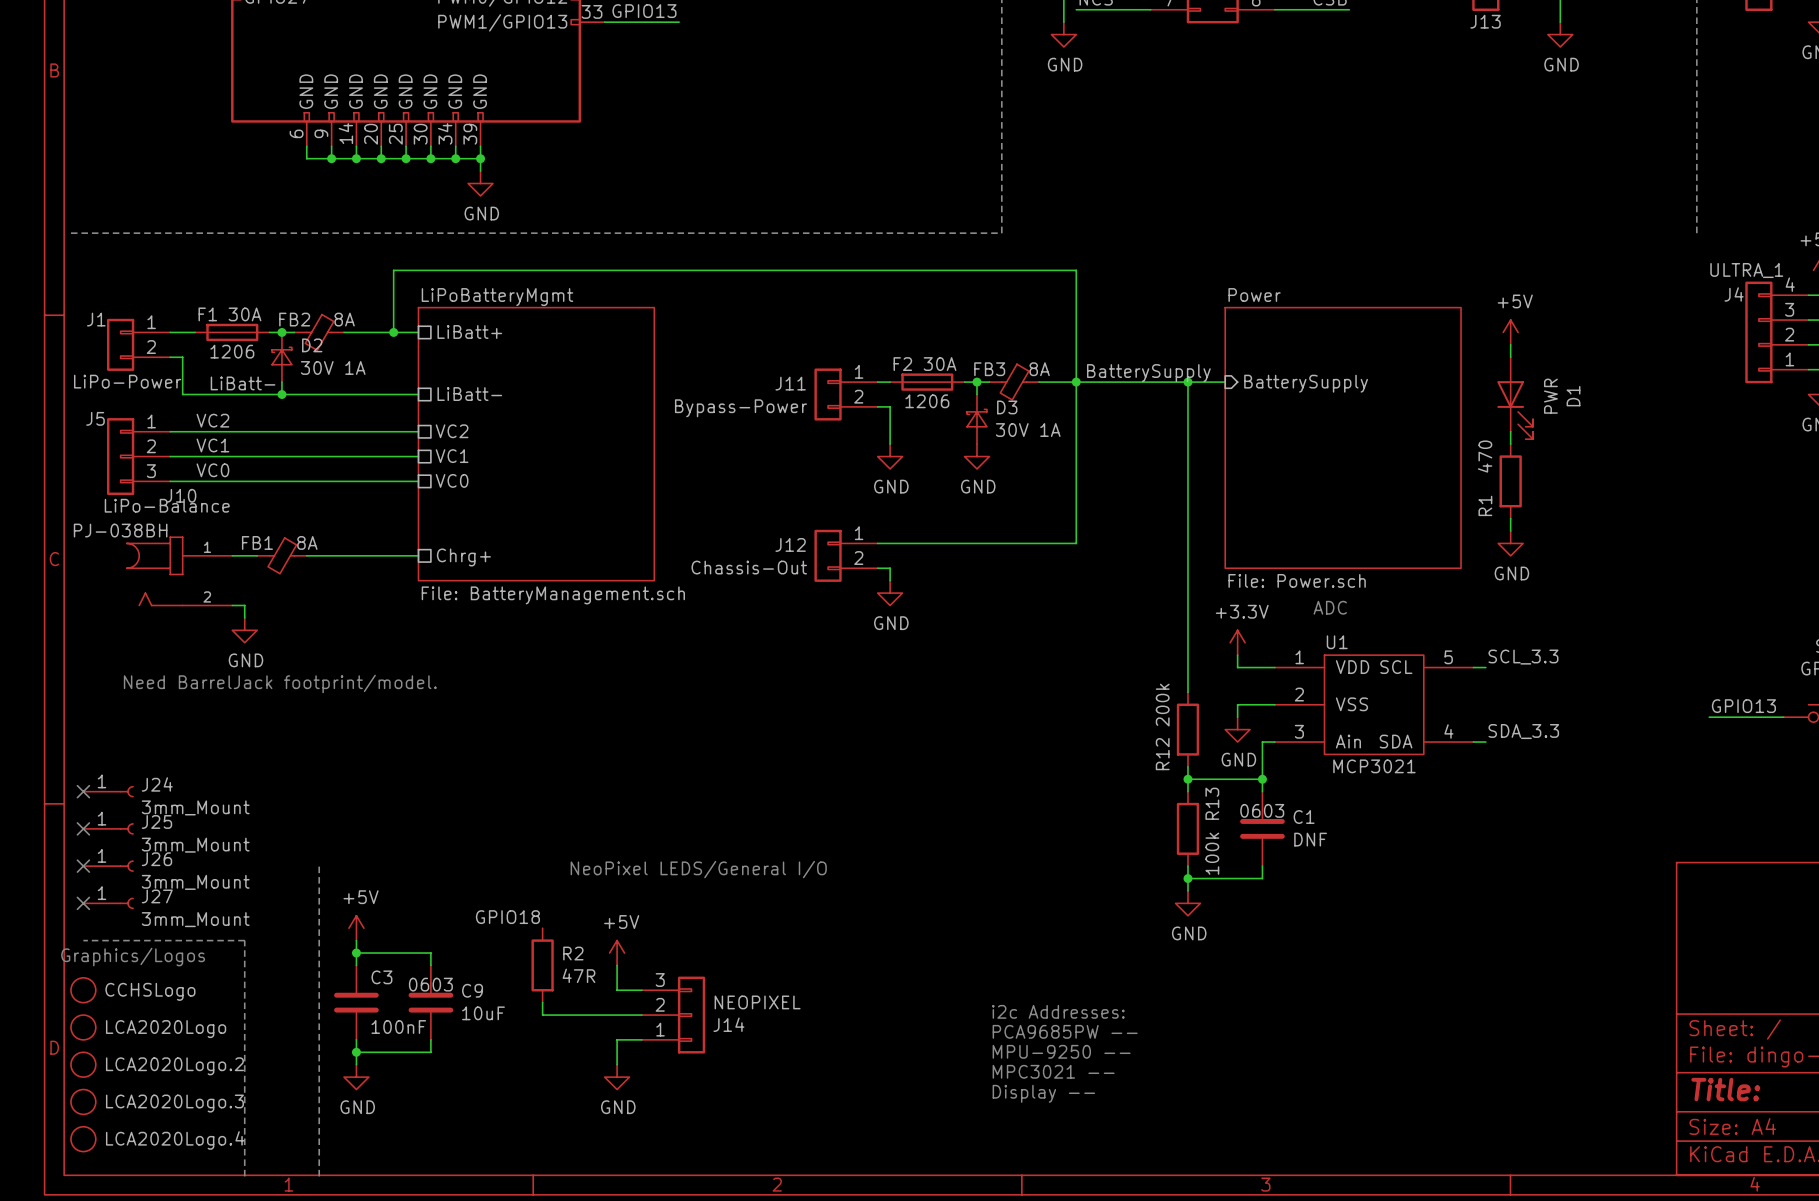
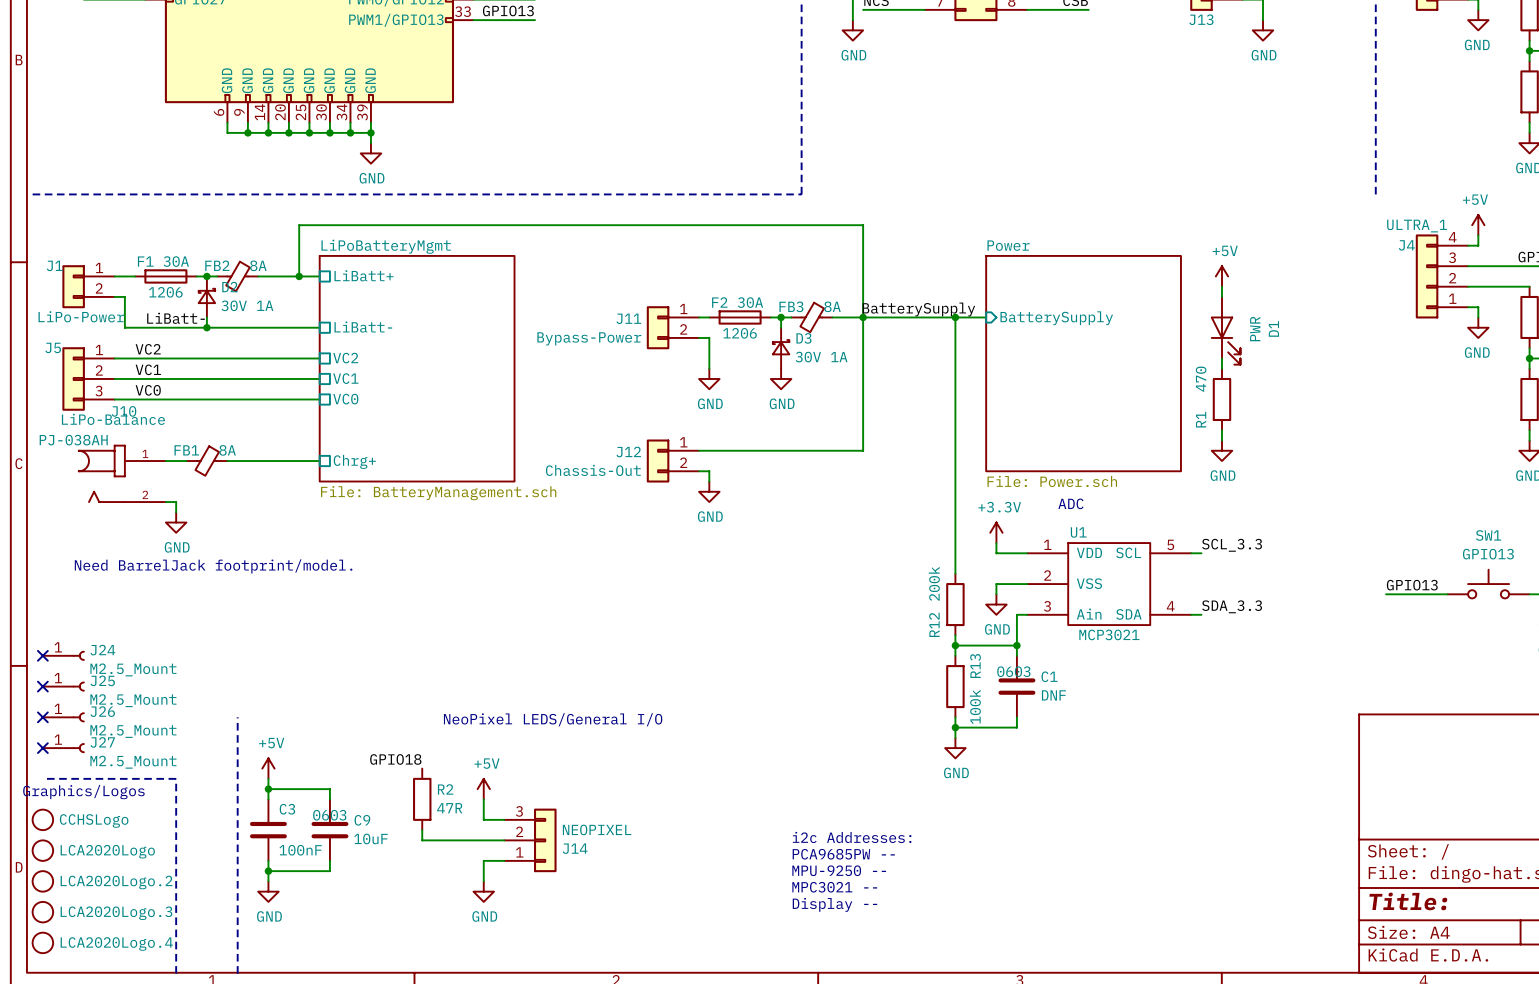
J10 value: PJ-038BH (120, 530) -> PJ-038AH (73, 440)
J24 value: 3mm_Mount (195, 807) -> M2.5_Mount (133, 669)
J25 value: 3mm_Mount (195, 845) -> M2.5_Mount (133, 700)
J26 value: 3mm_Mount (195, 882) -> M2.5_Mount (133, 731)
J27 value: 3mm_Mount (195, 919) -> M2.5_Mount (133, 762)

